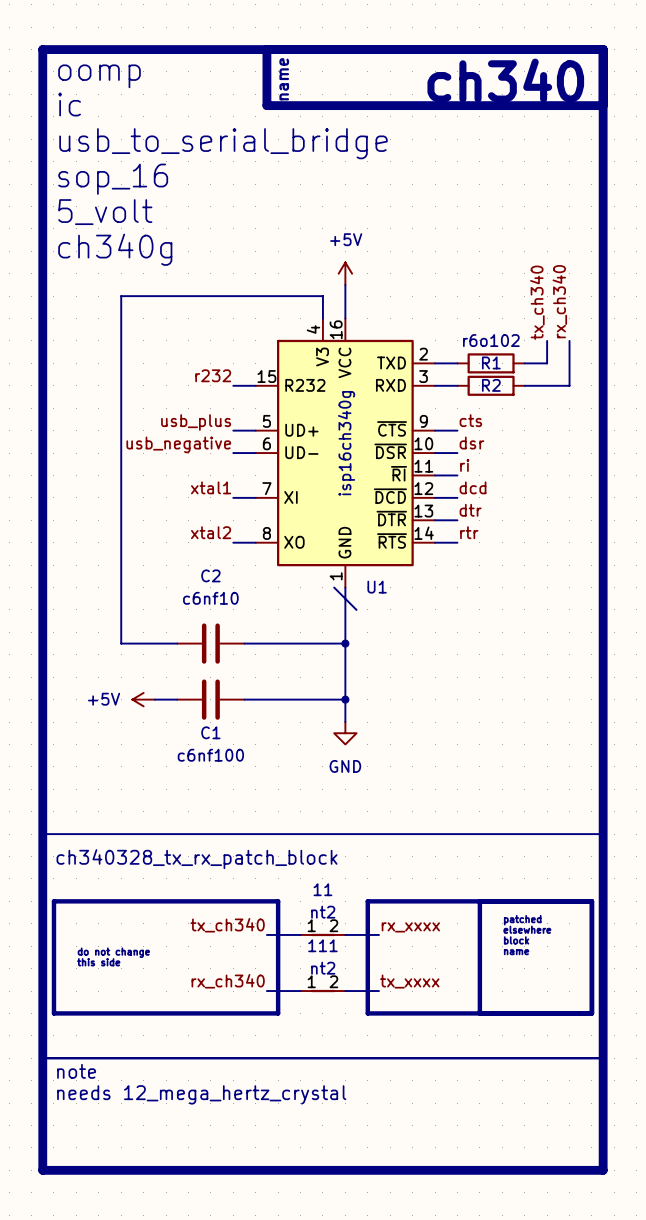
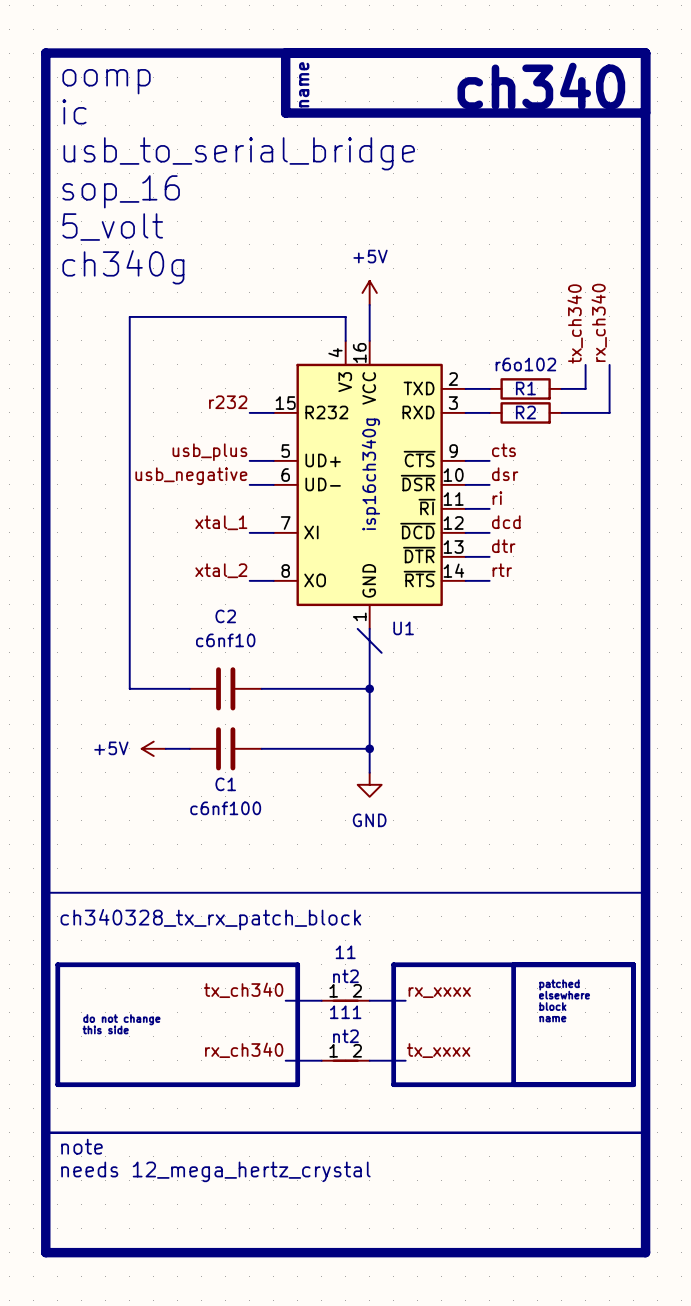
label: xtal1 (211, 487) -> xtal_1 (221, 522)
label: xtal2 (211, 532) -> xtal_2 (221, 570)

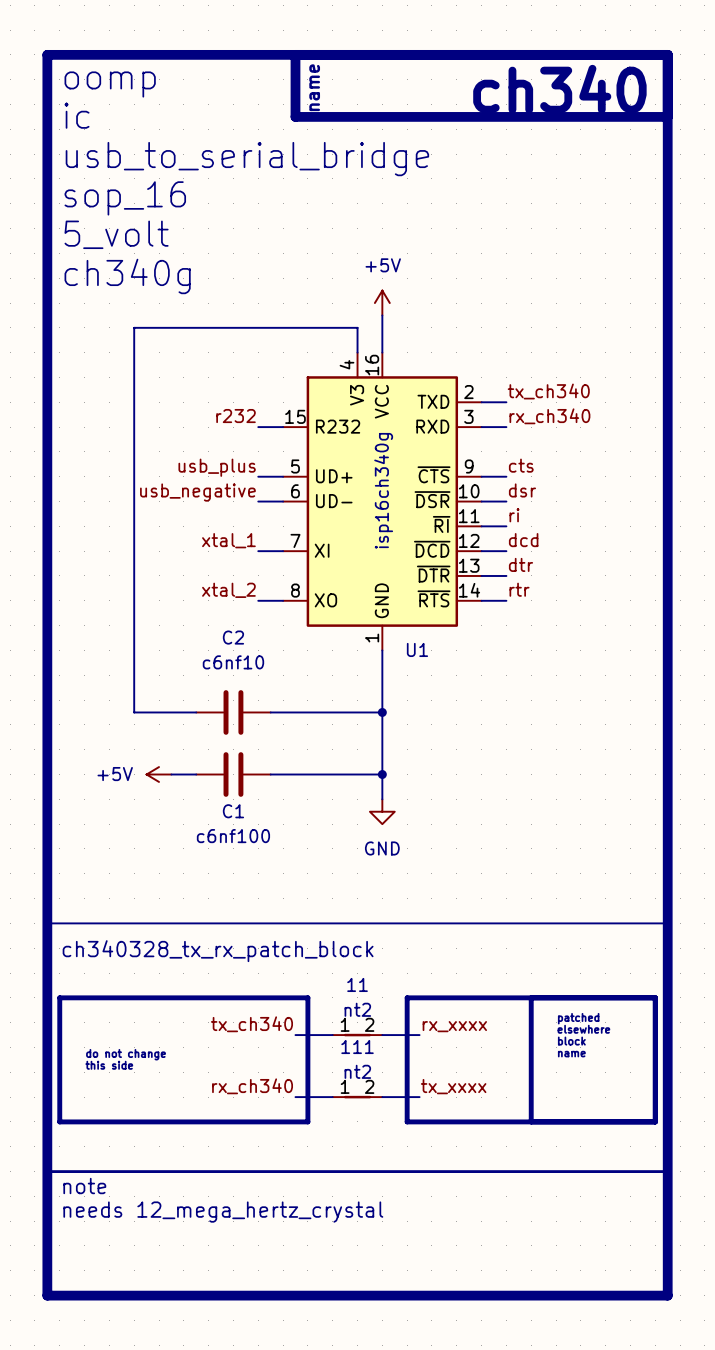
label rotation: 0° (599, 322) -> 90° clockwise (549, 416)
label position: rx_ch340 (599, 322) -> rx_ch340 (549, 416)
label rotation: 0° (575, 324) -> 90° clockwise (548, 391)
wire: (585, 364) (585, 388) (561, 388) -> none
wire: (609, 364) (609, 412) (561, 412) -> none
R1: r6o102 (525, 388) -> none
R2: (525, 412) -> none
wire: (357, 628) (381, 652) -> none

